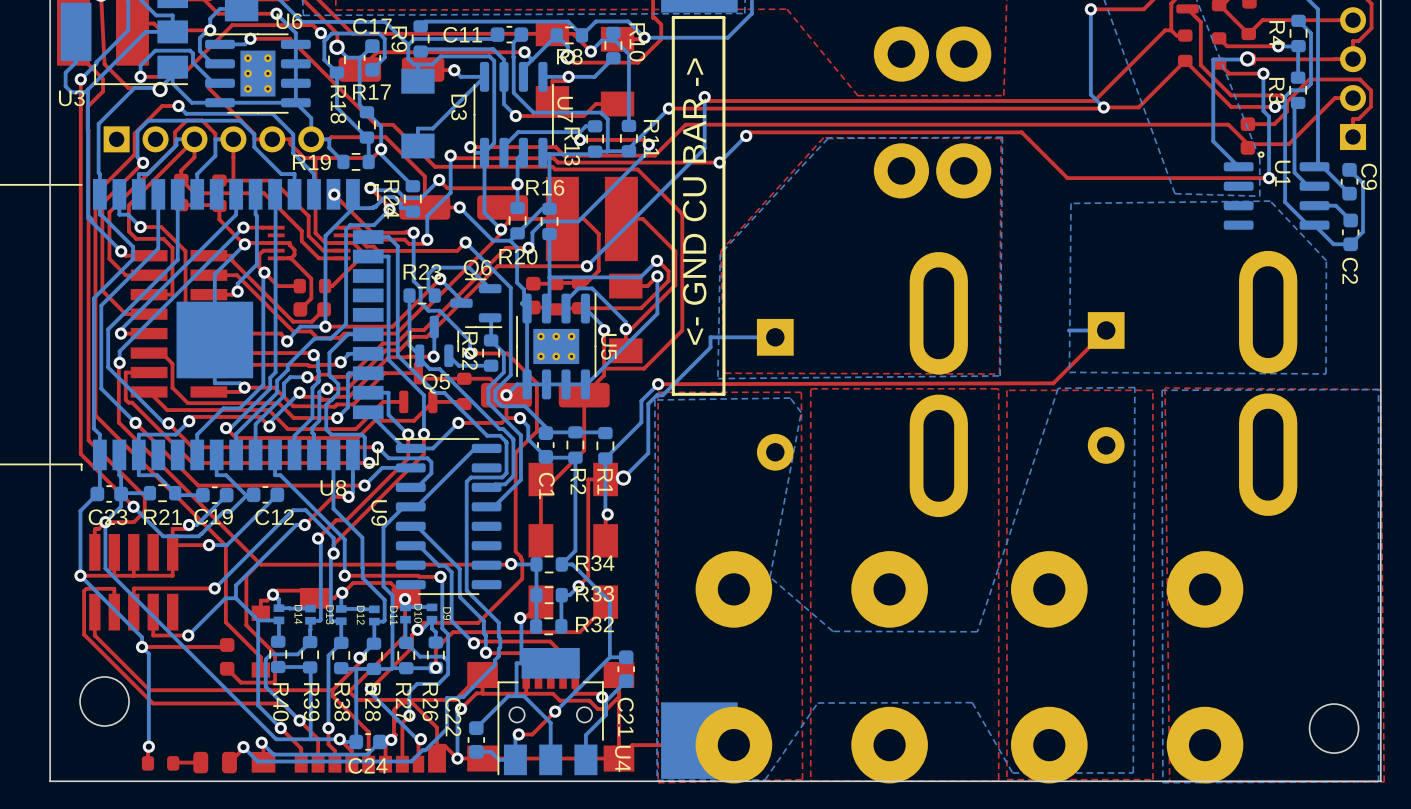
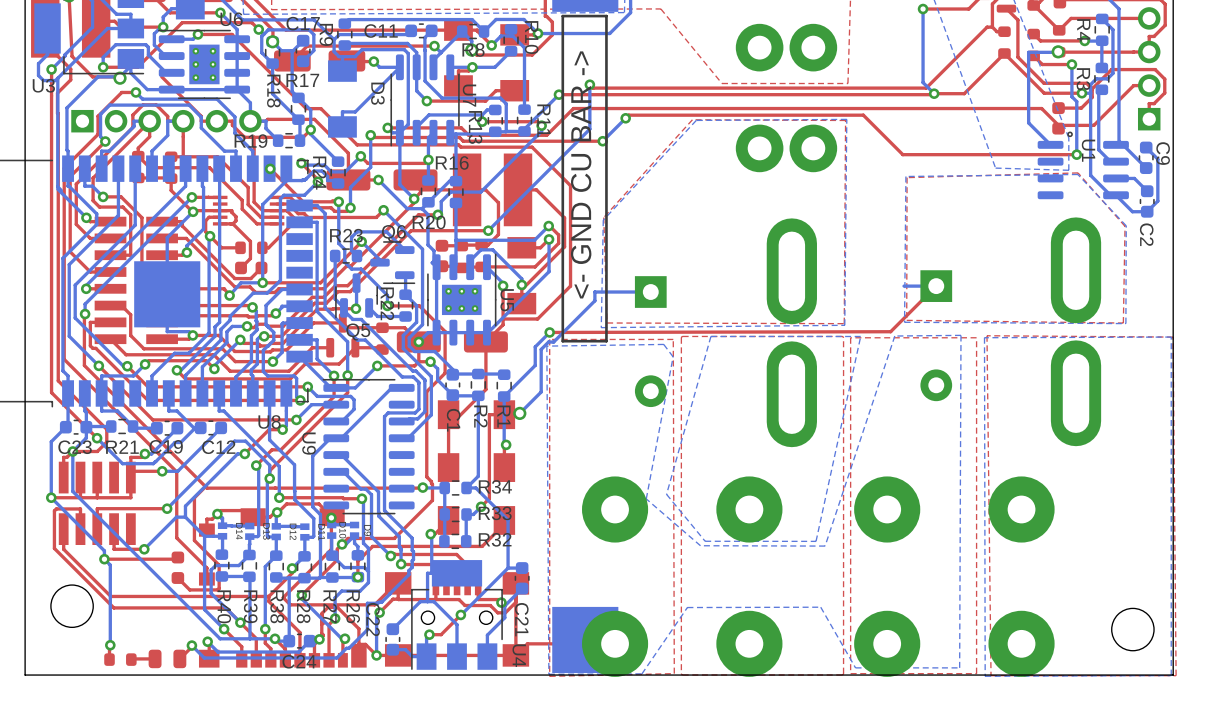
top zone outline: none -> (1078, 172) (1125, 226) (1123, 323) (906, 320) (907, 177) (1078, 172)
bottom zone outline: none -> (860, 336) (816, 541) (705, 541) (666, 494) (710, 336) (860, 336)

